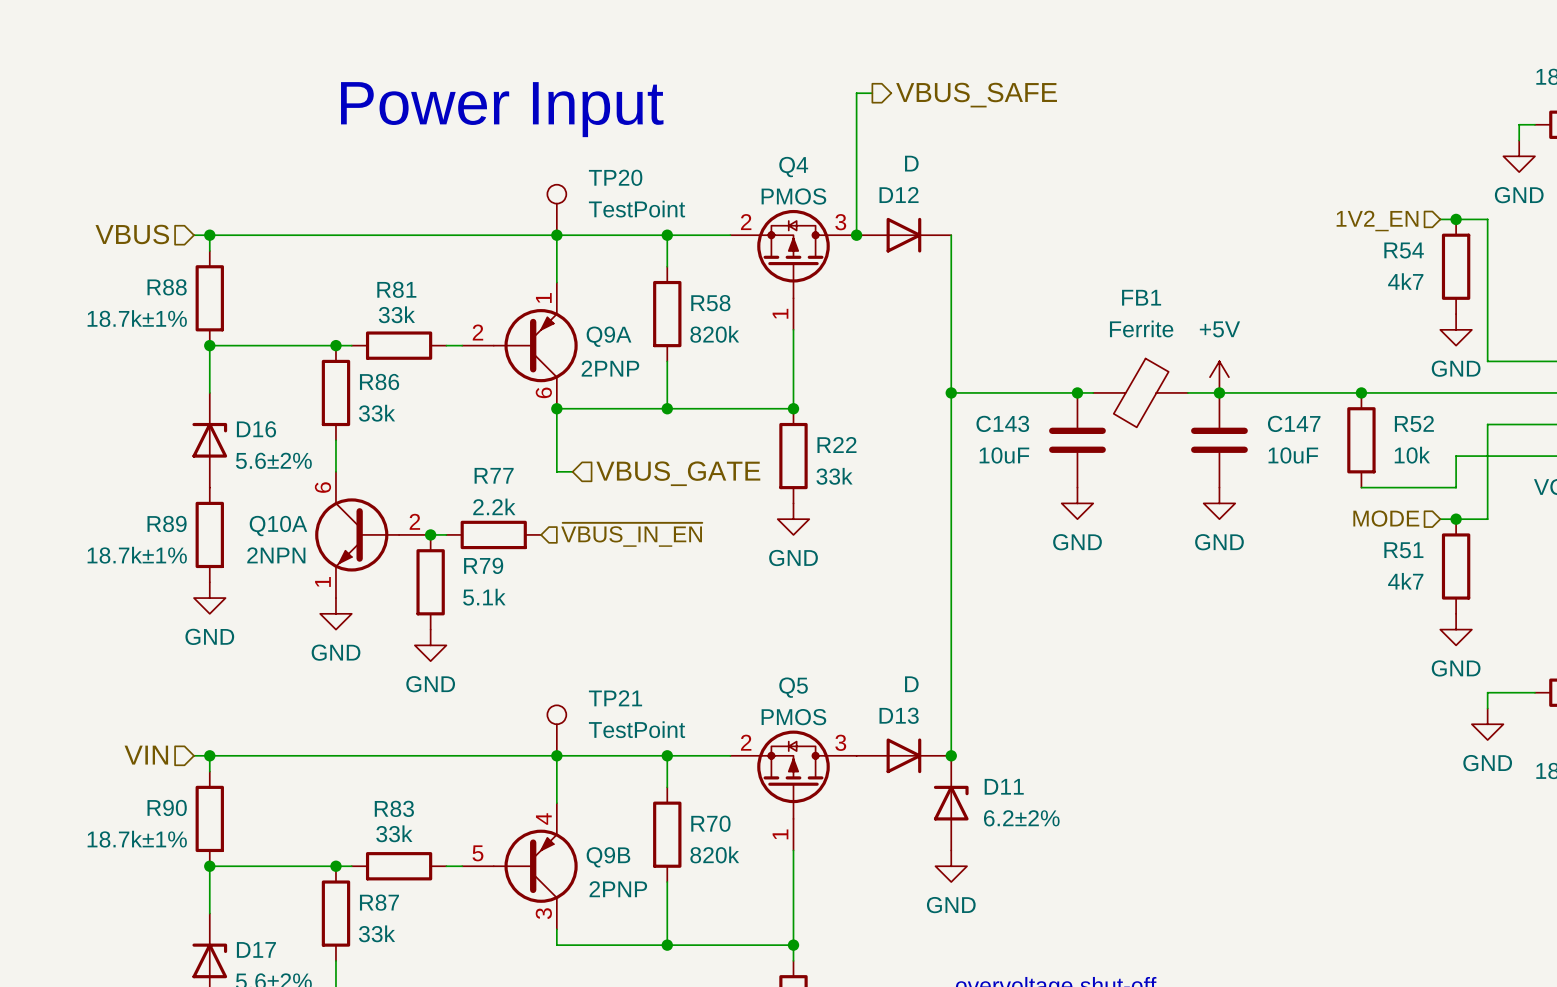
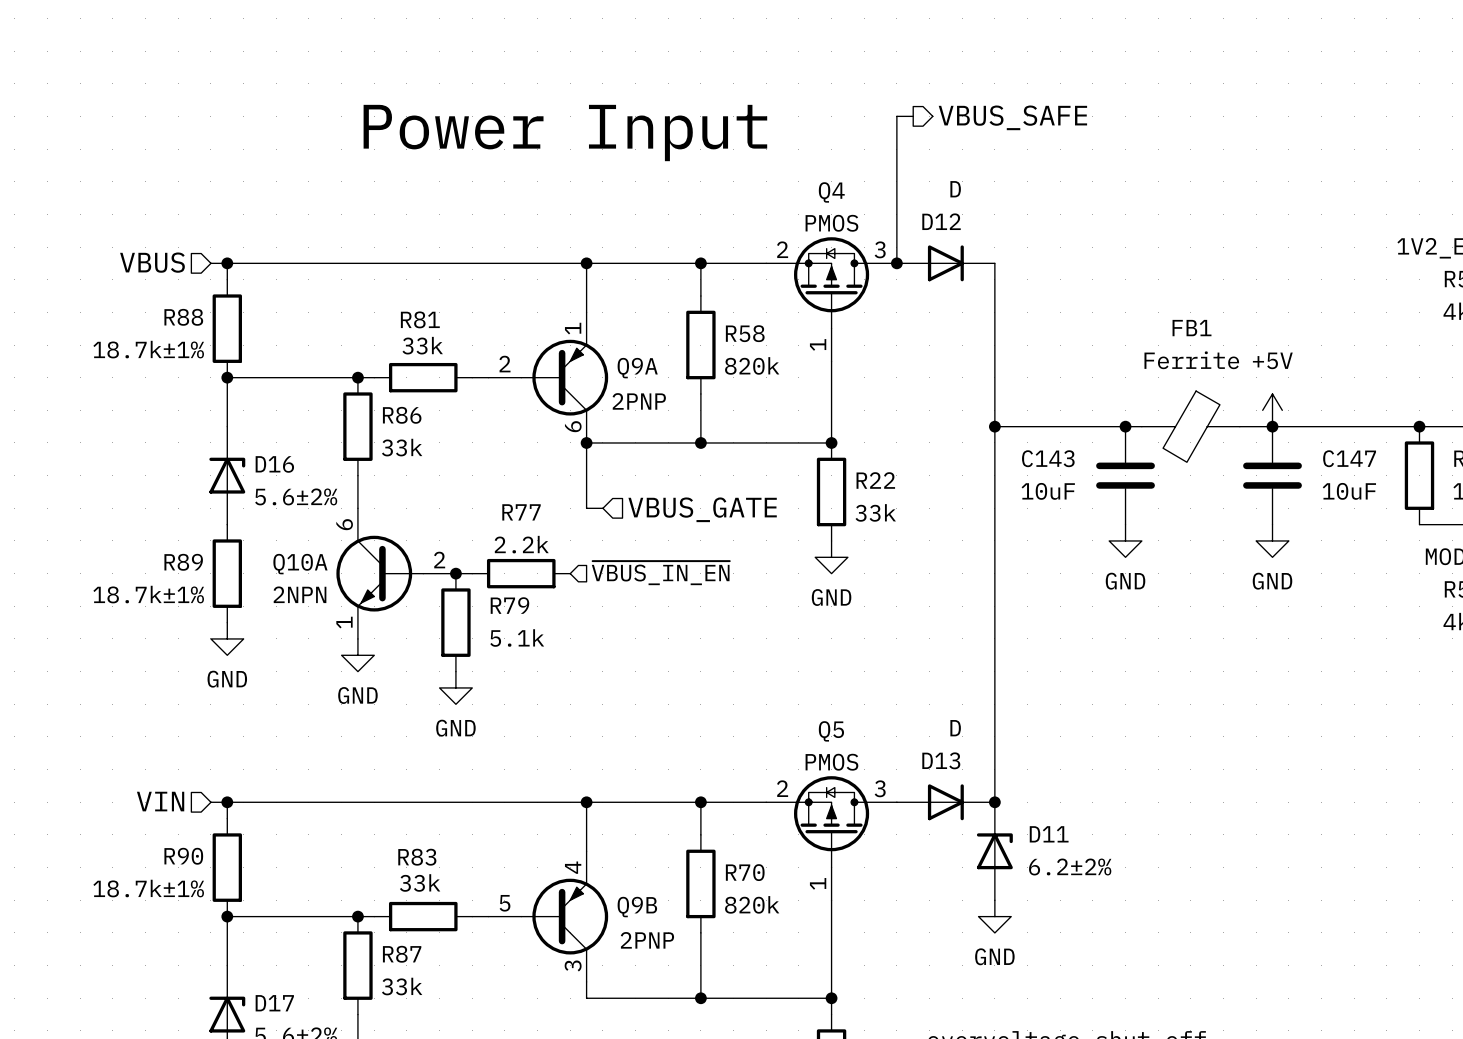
TP20: TestPoint (556, 209) -> none
TP21: TestPoint (556, 730) -> none

